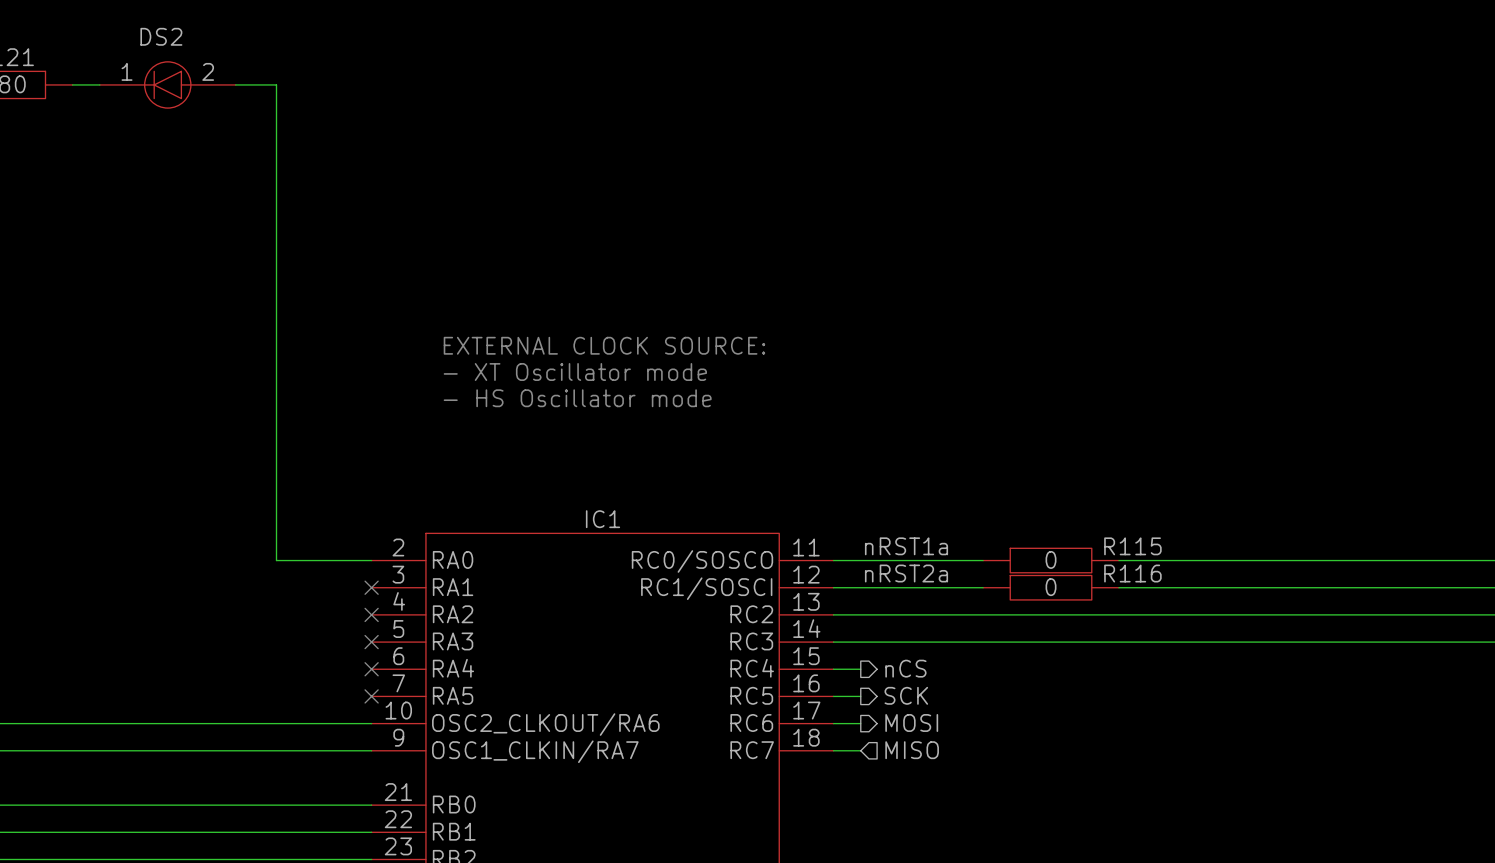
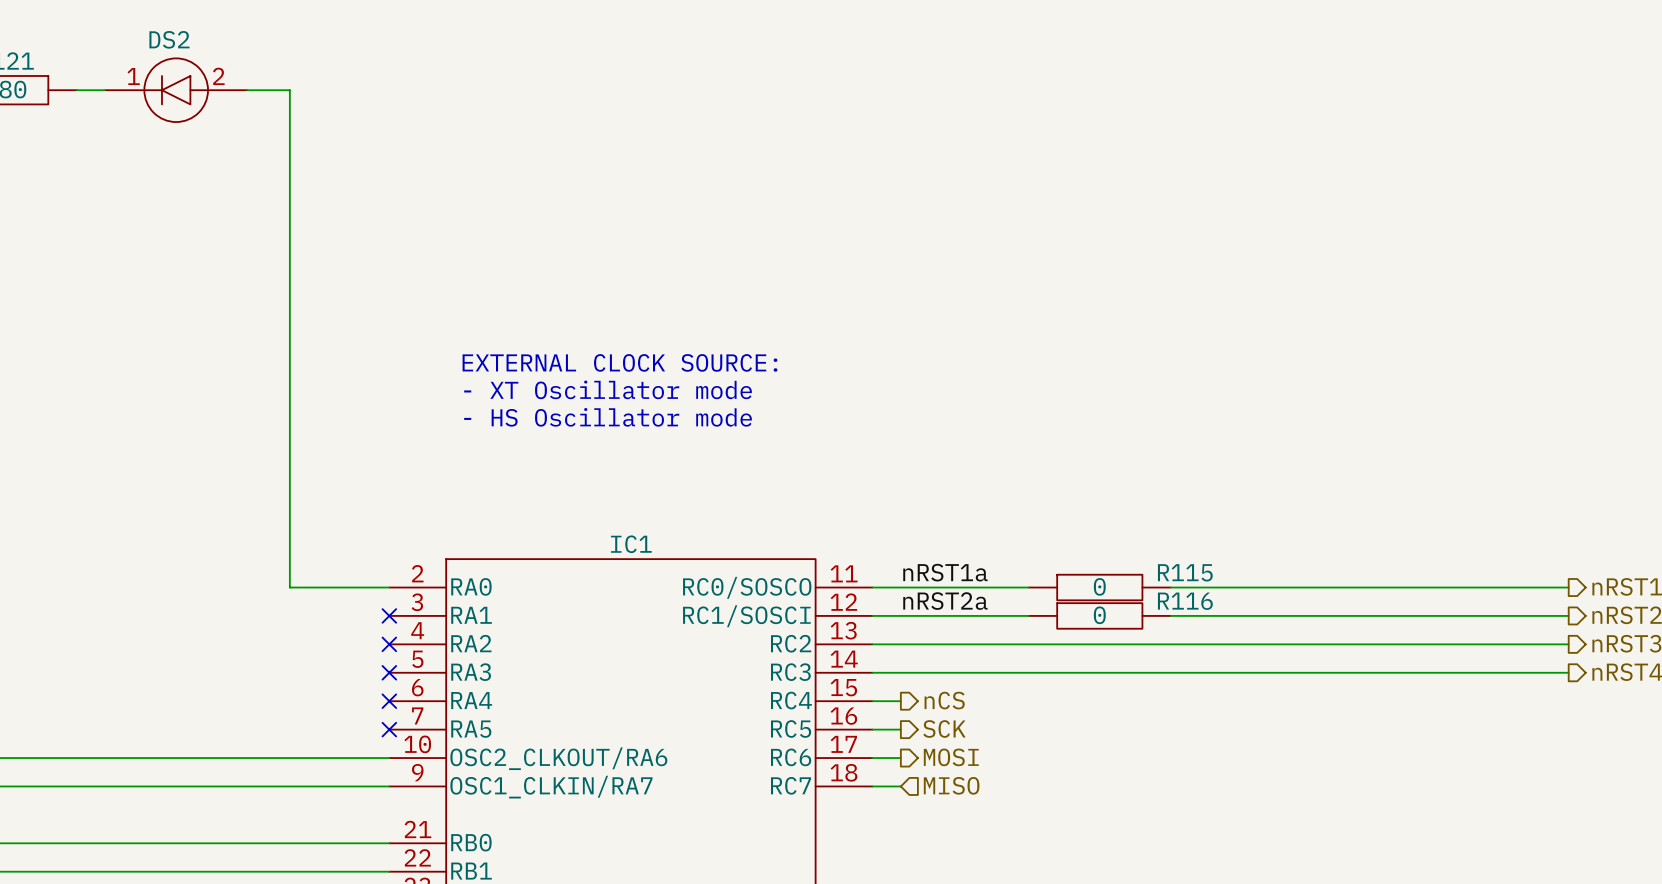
DS2 symbol: [99, 61, 236, 109] -> [105, 58, 248, 123]

